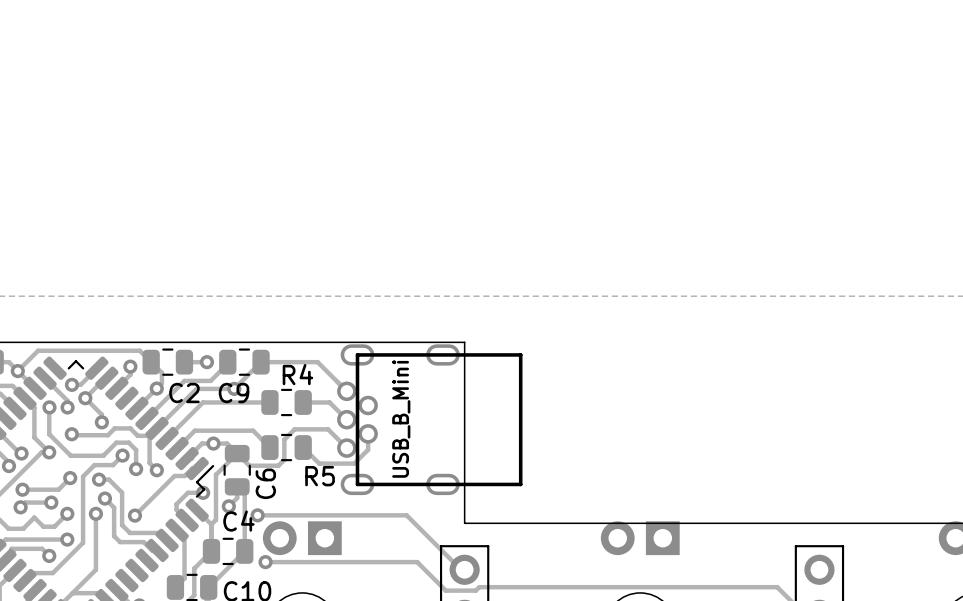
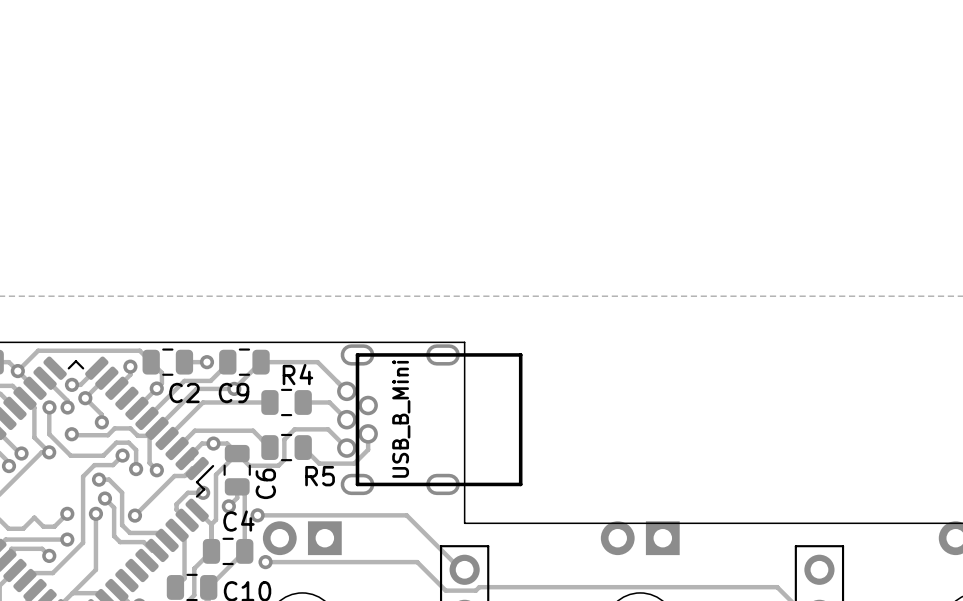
track: (70, 478) (58, 489) (22, 489) -> none
via: (70, 478) -> none
via: (22, 489) -> none
track: (51, 502) (25, 502) (20, 507) -> none
via: (51, 502) -> none
via: (20, 507) -> none

